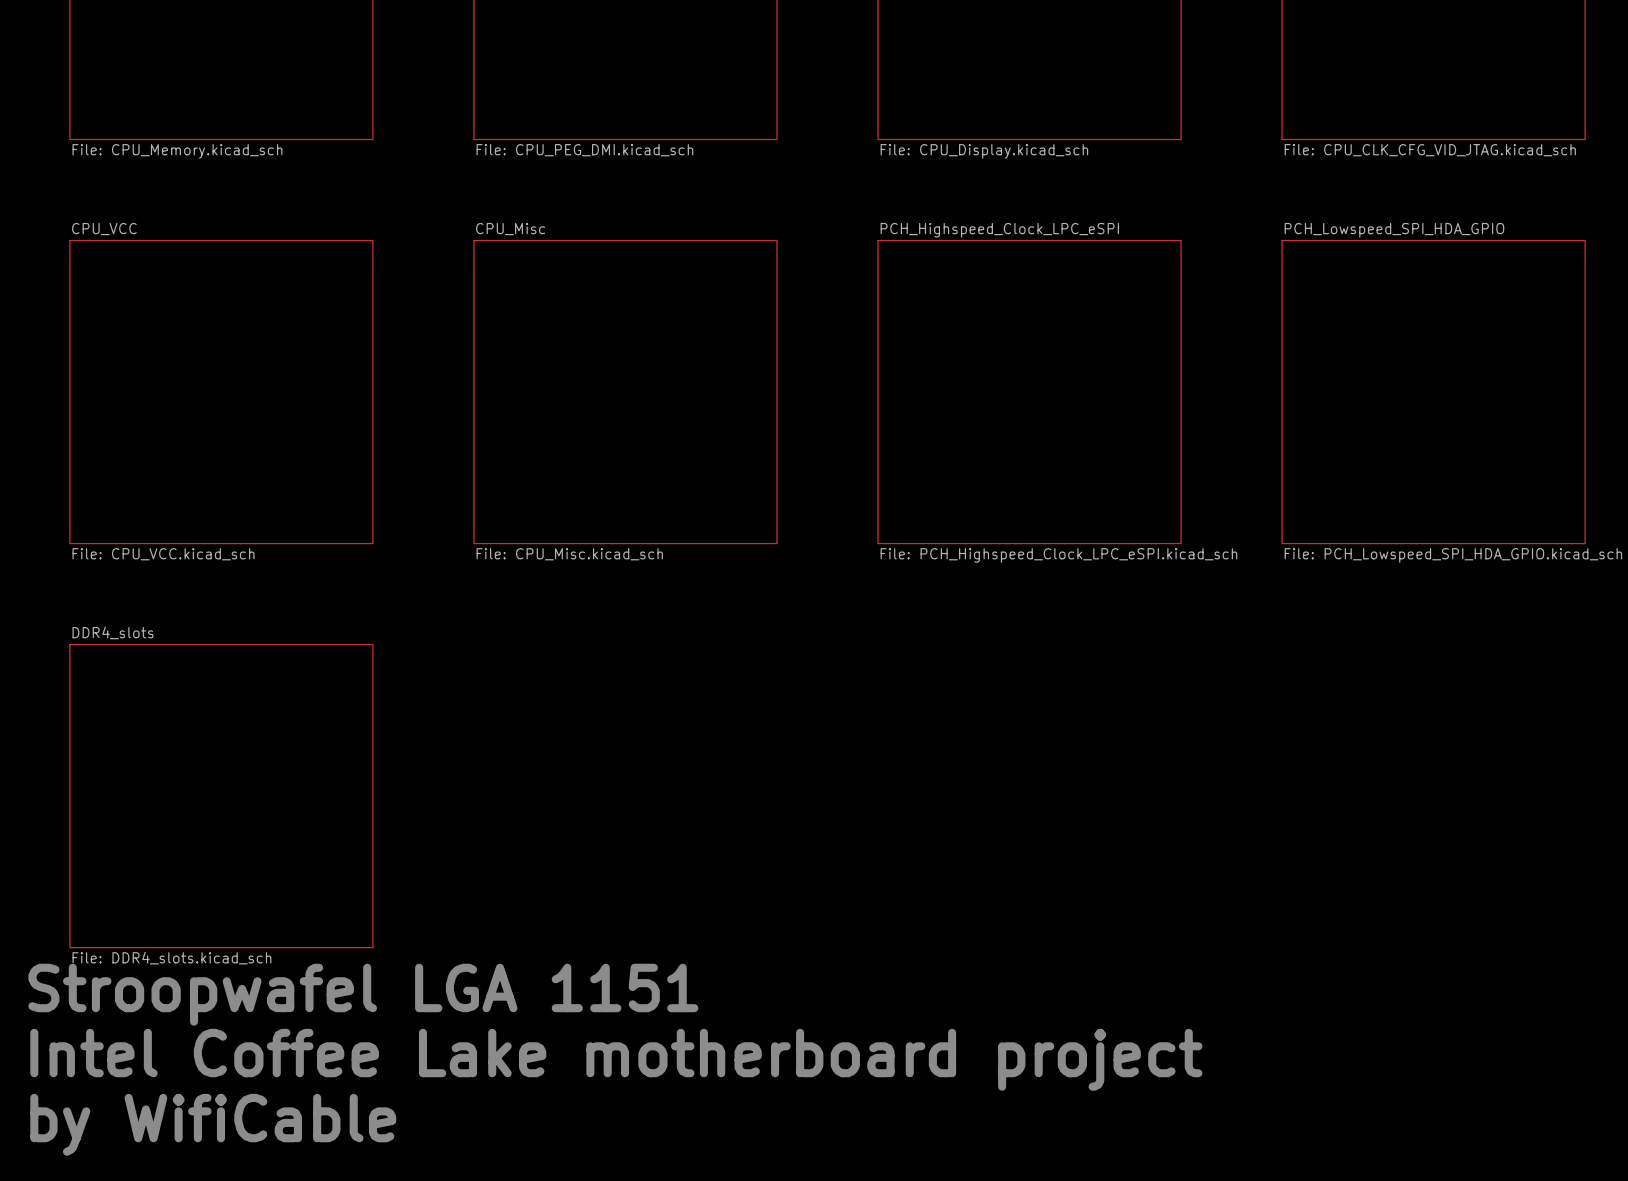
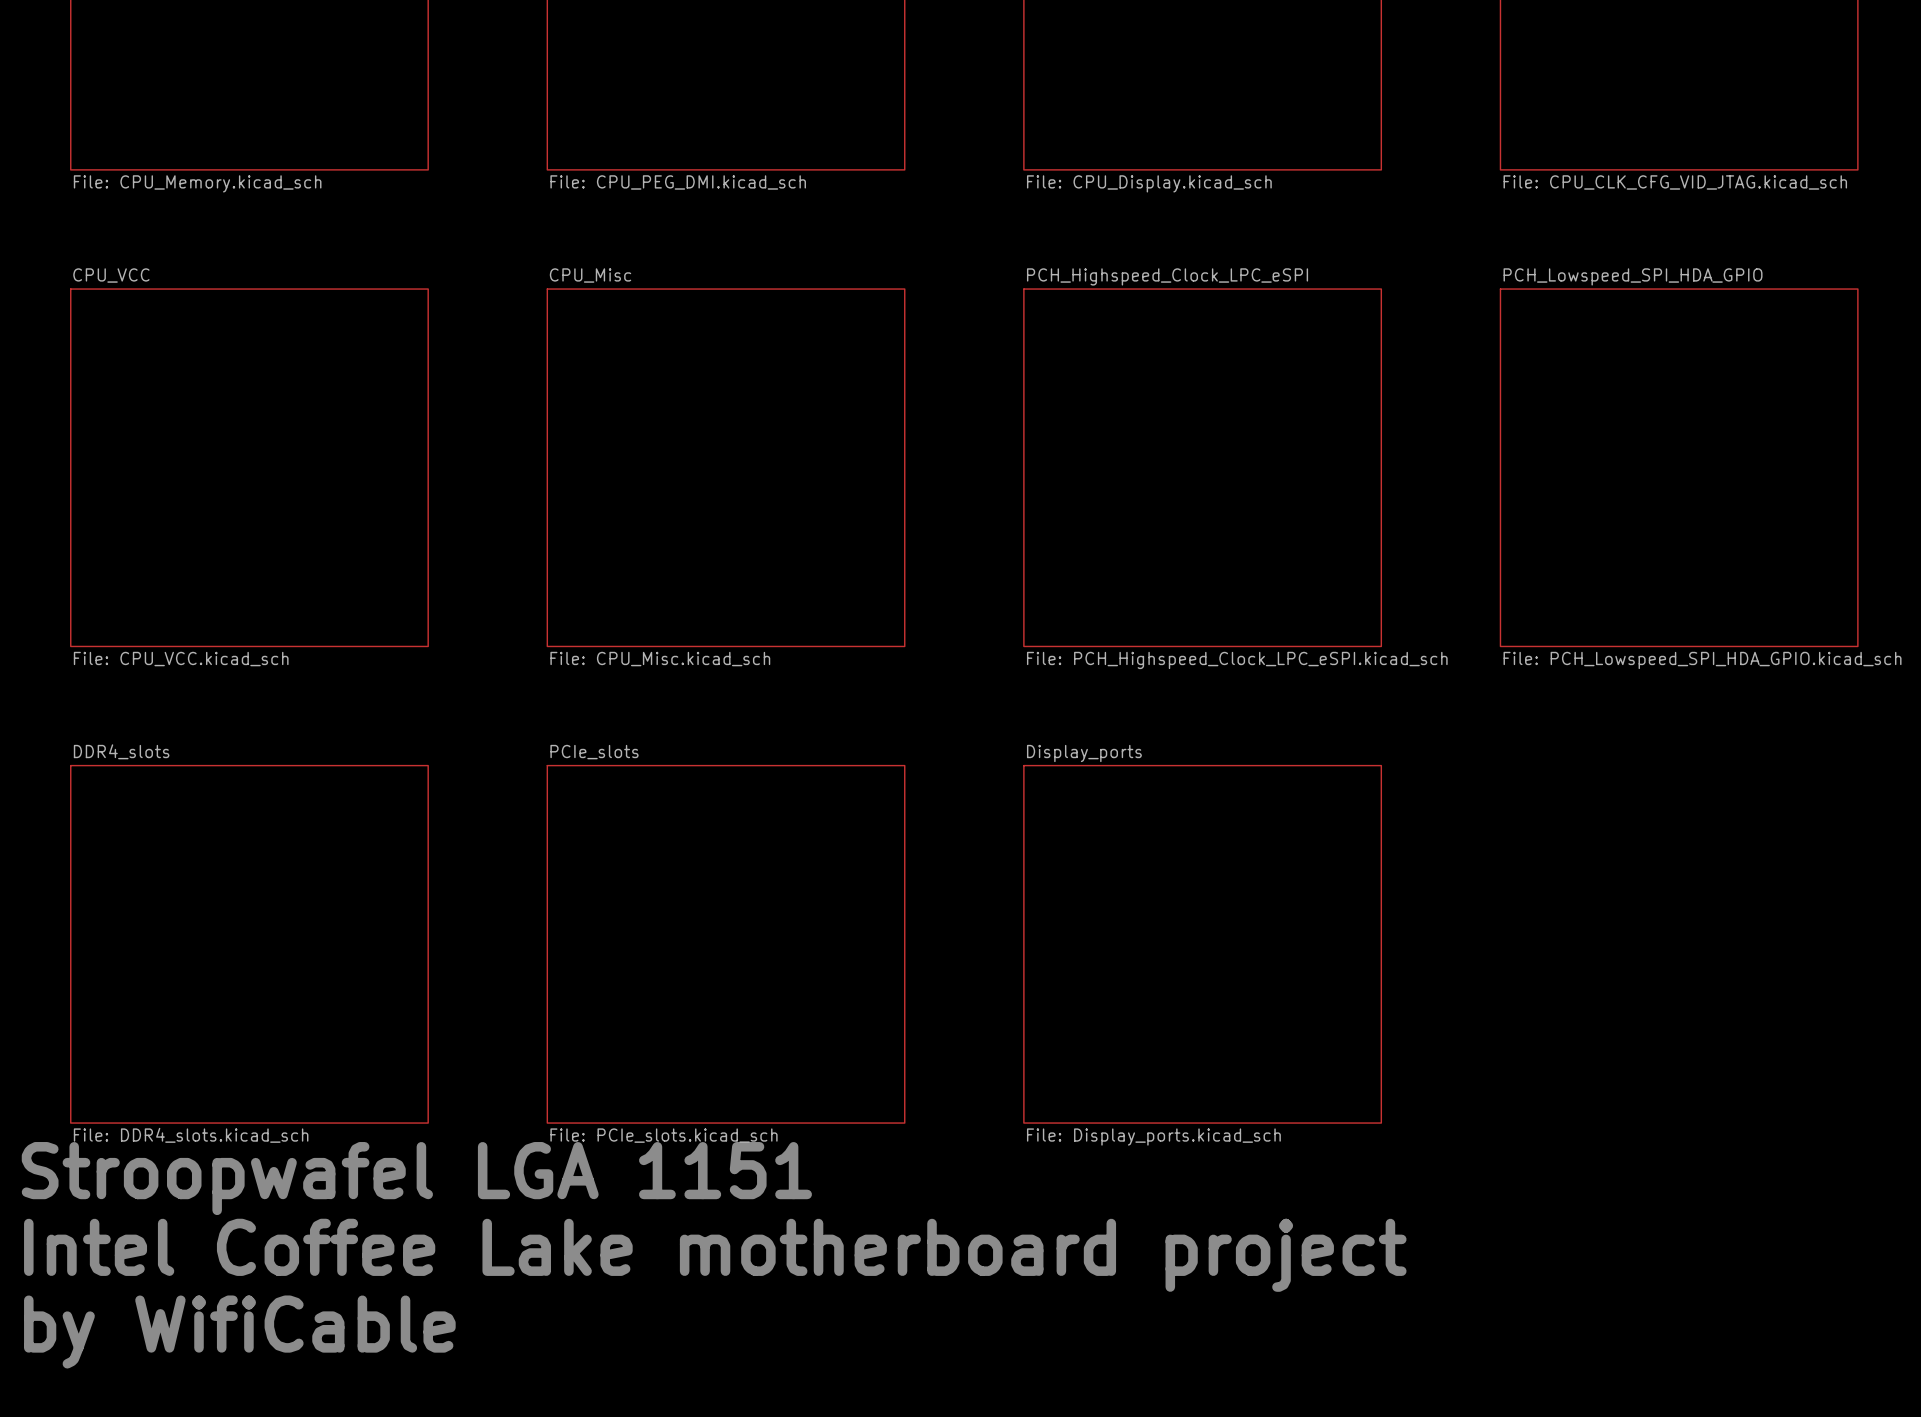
sheet PCIe_slots: none -> File: PCIe_slots.kicad_sch (726, 944)
sheet Display_ports: none -> File: Display_ports.kicad_sch (1202, 944)

